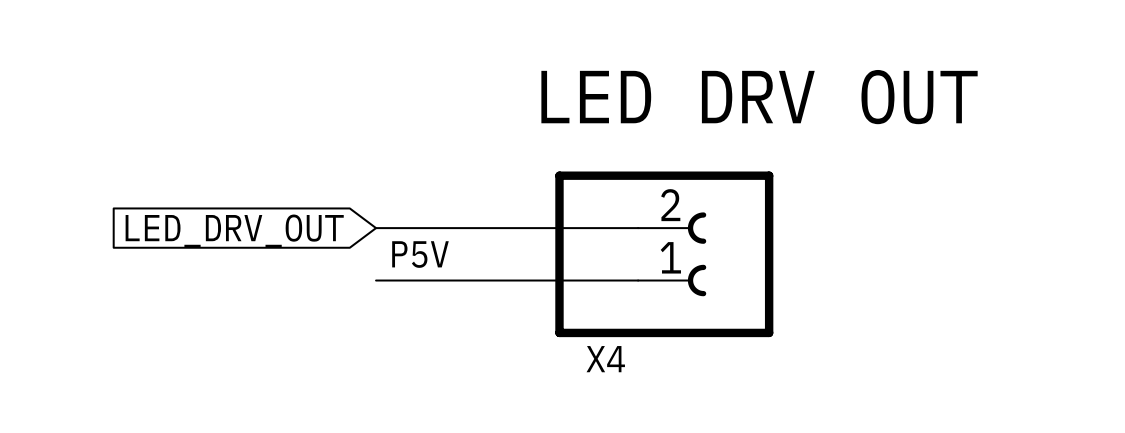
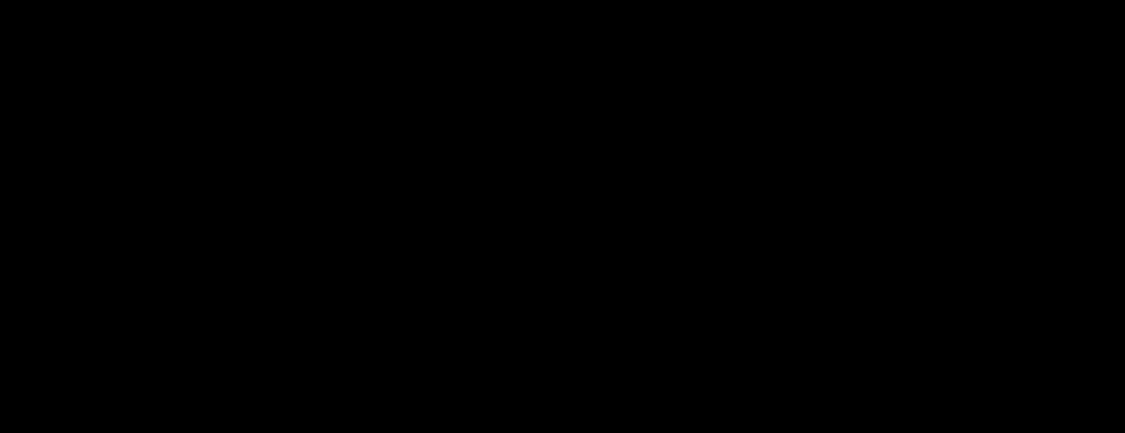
wire: (376, 228) (638, 228) -> none
global label: LED_DRV_OUT (234, 231) -> none
label: P5V (420, 254) -> none
X4: (664, 254) -> none
wire: (376, 280) (638, 280) -> none

